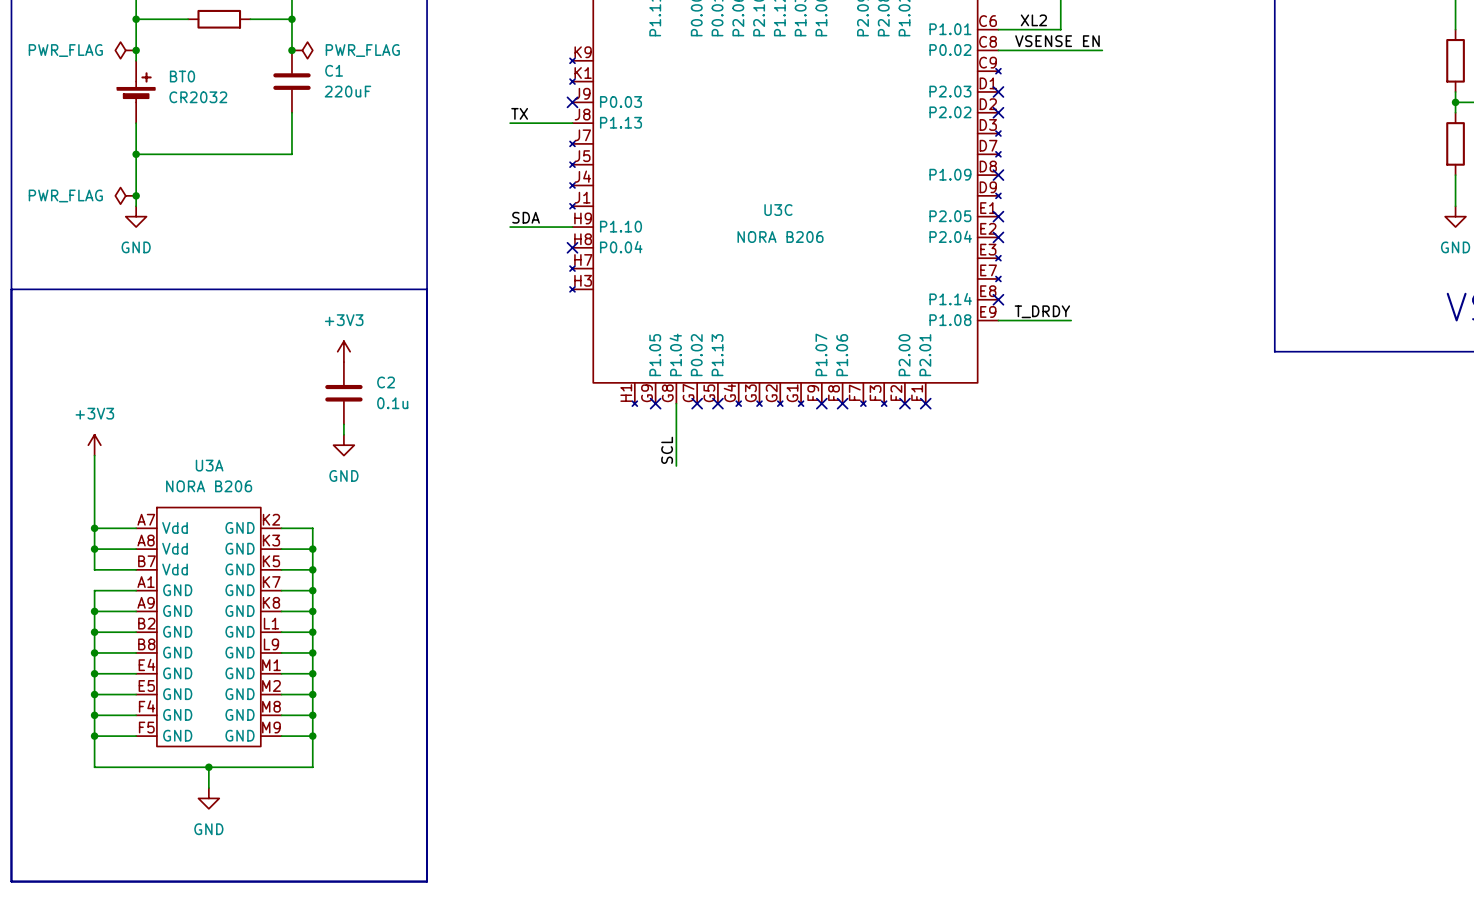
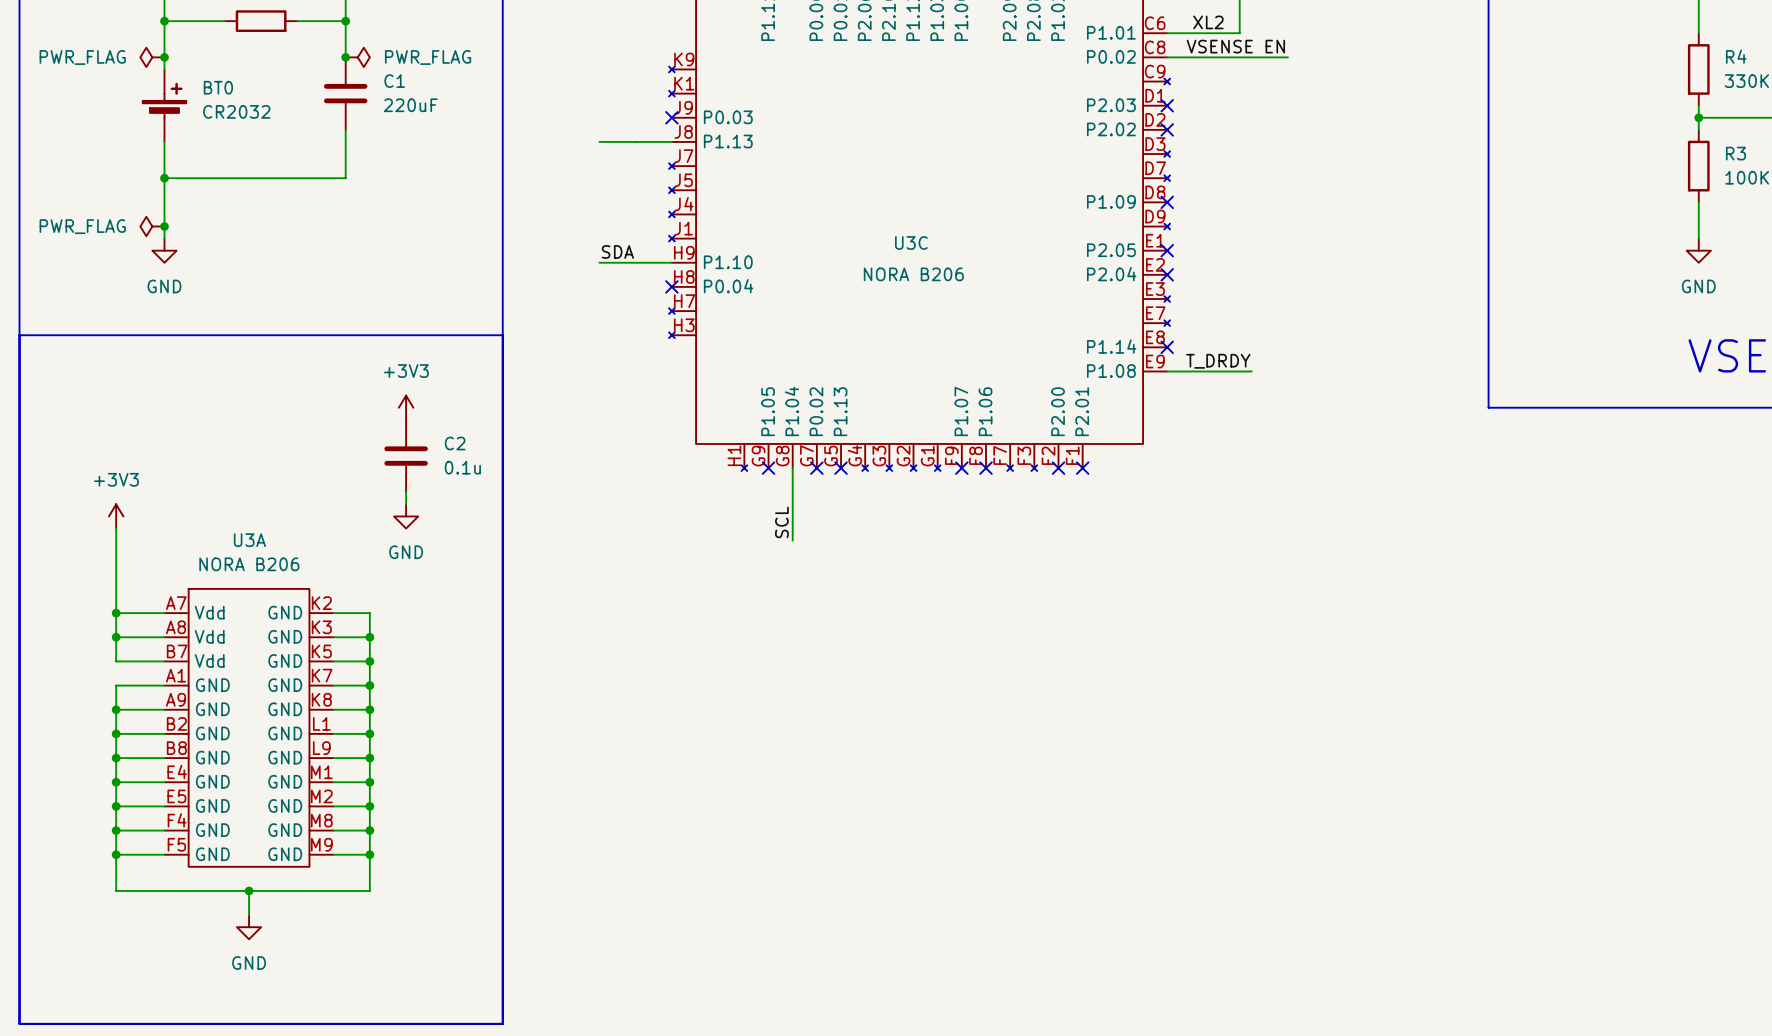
label: TX (519, 113) -> none

